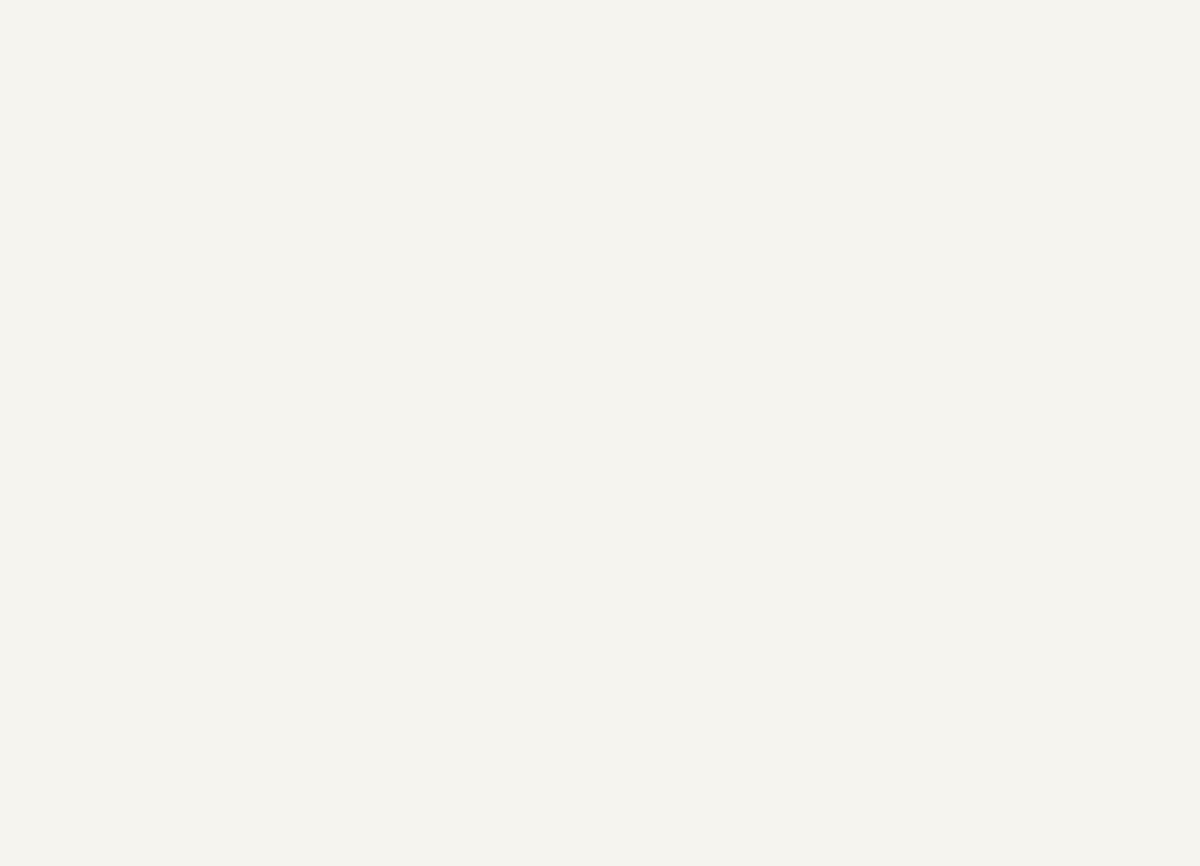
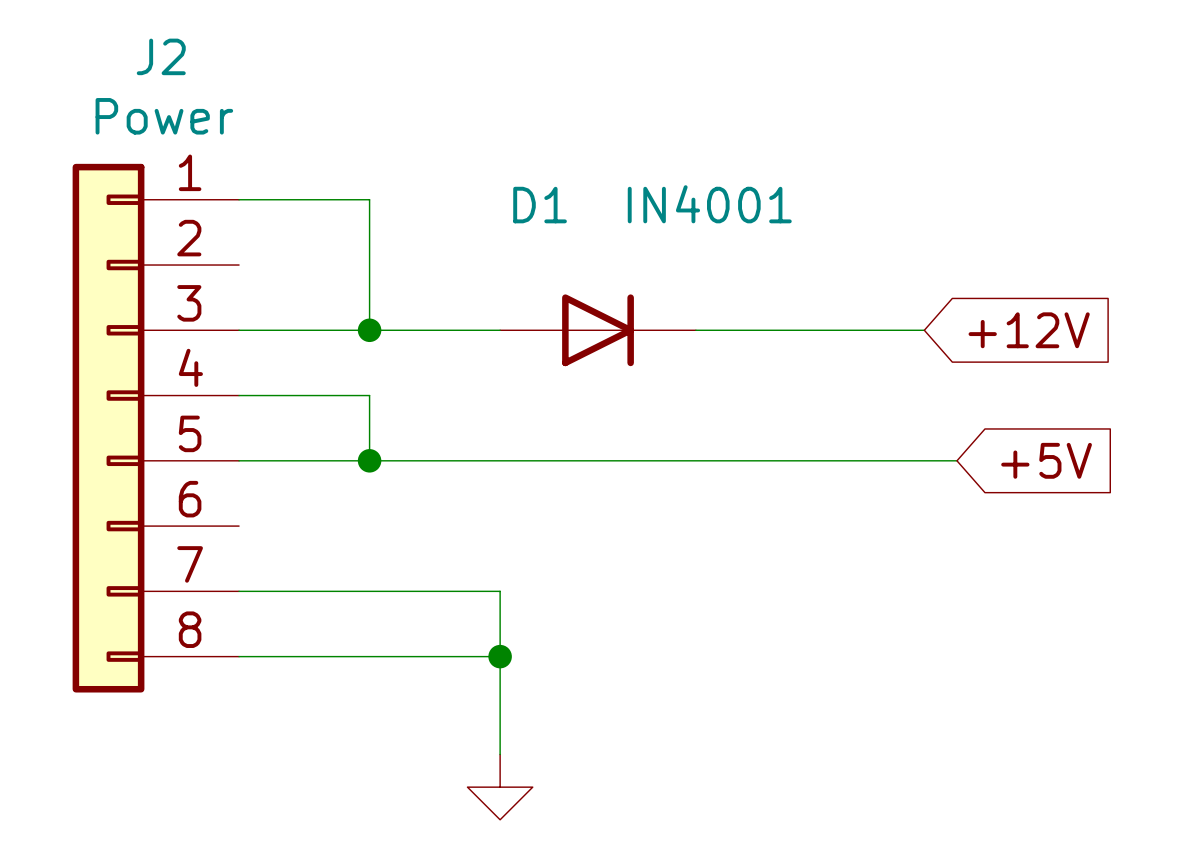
wire: none -> (239, 199) (369, 199) (369, 330)
wire: none -> (239, 330) (500, 330)
junction: none -> (369, 330)
D1: none -> IN4001 (598, 330)
wire: none -> (695, 330) (924, 330)
global label: none -> +12V (1029, 330)
wire: none -> (239, 395) (369, 395) (369, 460)
J2: none -> Power (155, 428)
wire: none -> (239, 460) (956, 460)
junction: none -> (369, 460)
global label: none -> +5V (1046, 460)
wire: none -> (239, 591) (500, 591) (500, 754)
wire: none -> (239, 656) (500, 656)
junction: none -> (500, 656)
power symbol: none -> (500, 787)

